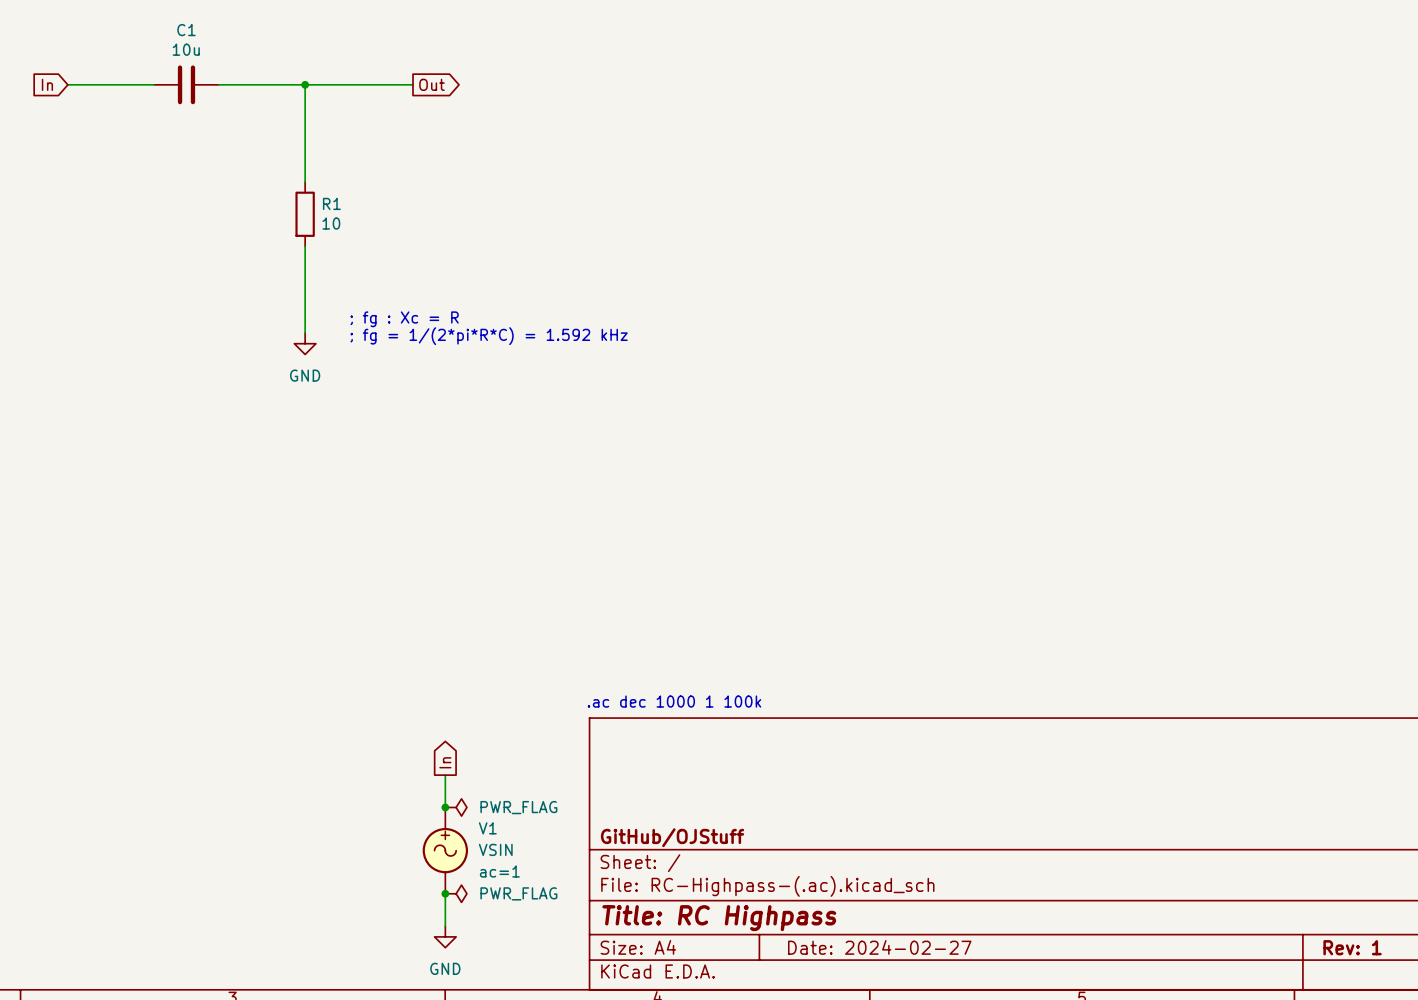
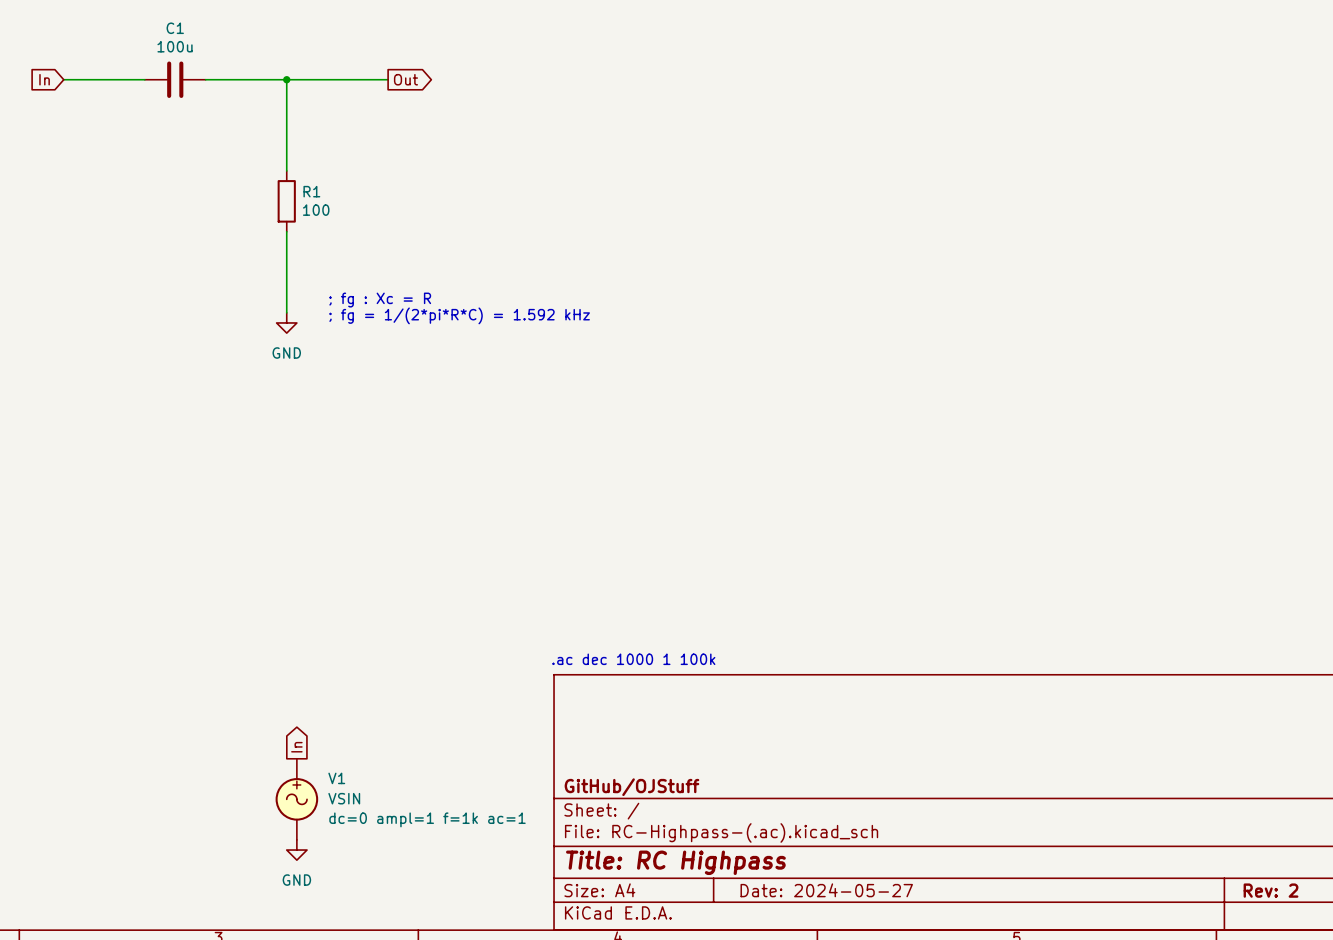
C1 value: 10u (186, 49) -> 100u (175, 46)
R1 value: 10 (331, 223) -> 100 (316, 210)
global label position: In (445, 762) -> In (296, 747)
wire: (445, 775) (445, 807) -> none
junction: (445, 807) -> none
power symbol: PWR_FLAG (456, 807) -> none
V1 position: (445, 850) -> (296, 799)
V1 text: ac=1 (499, 871) -> dc=0 ampl=1 f=1k ac=1 (427, 819)
wire: (445, 893) (445, 926) -> none
junction: (445, 893) -> none
power symbol: PWR_FLAG (456, 893) -> none
power symbol position: GND (445, 936) -> GND (296, 850)
title block: Date: 2024-02-27 (879, 947) -> Date: 2024-05-27 (826, 890)
title block: Rev: 1 (1352, 947) -> Rev: 2 (1271, 890)

